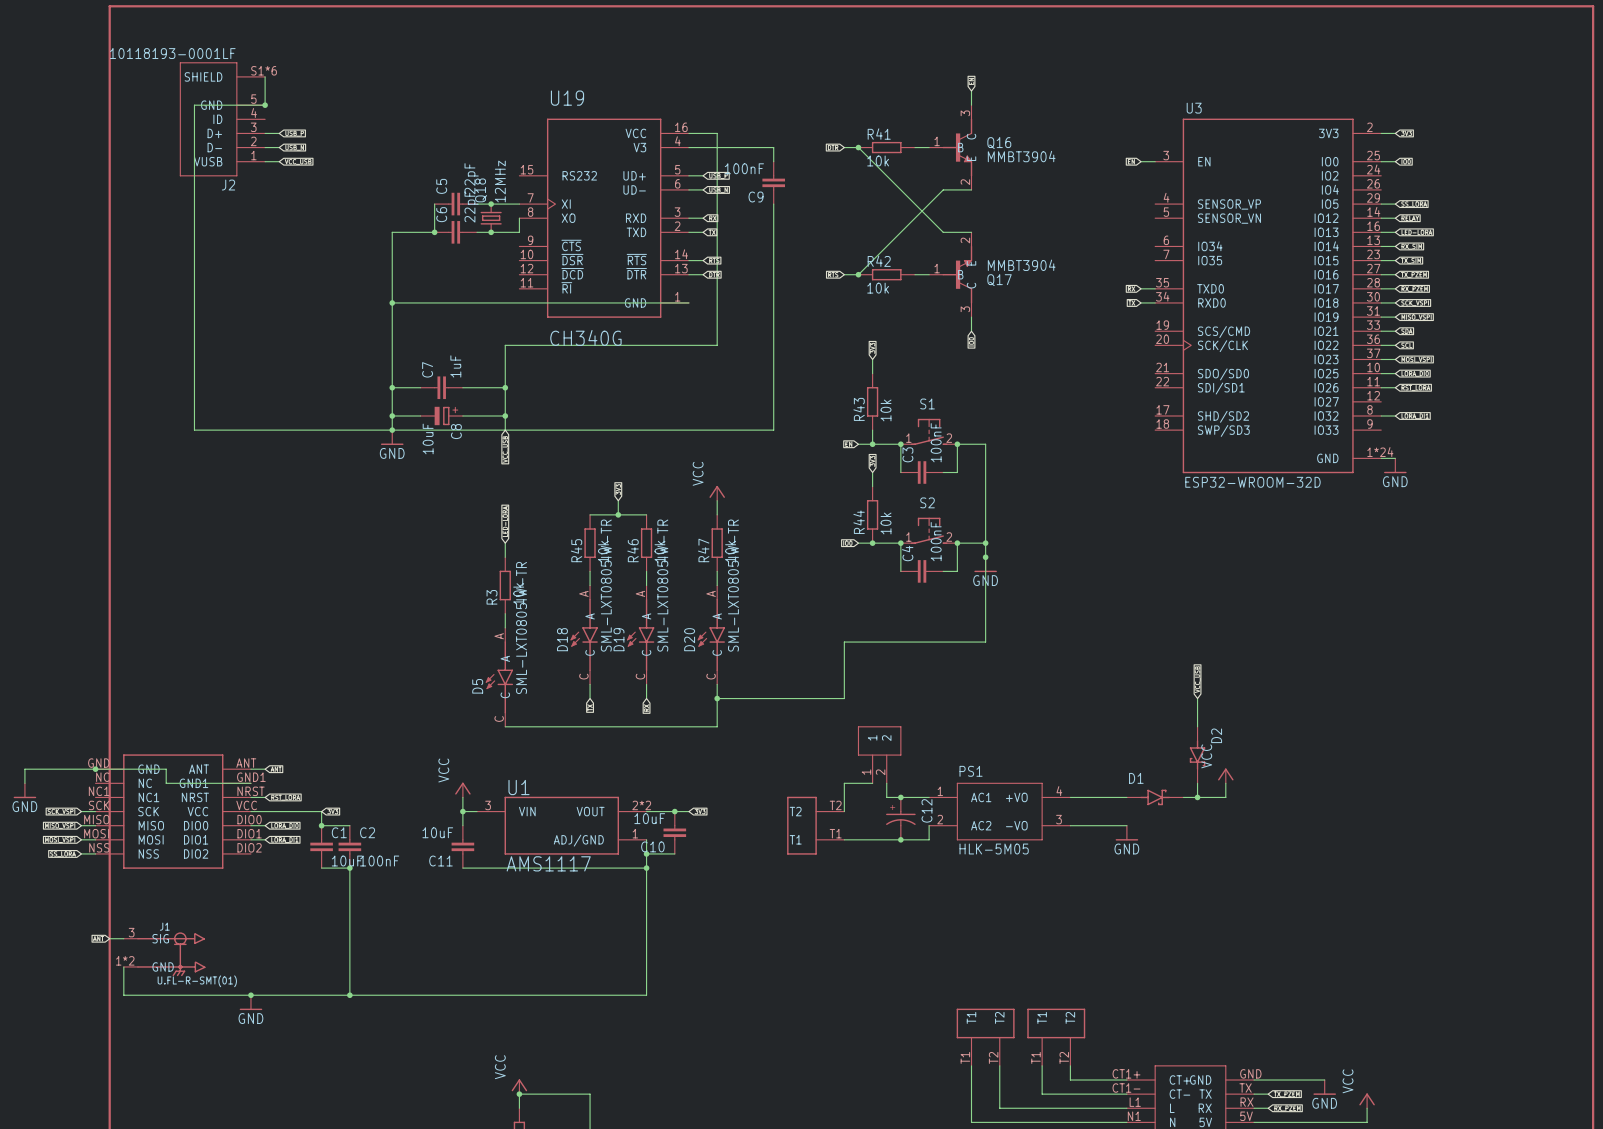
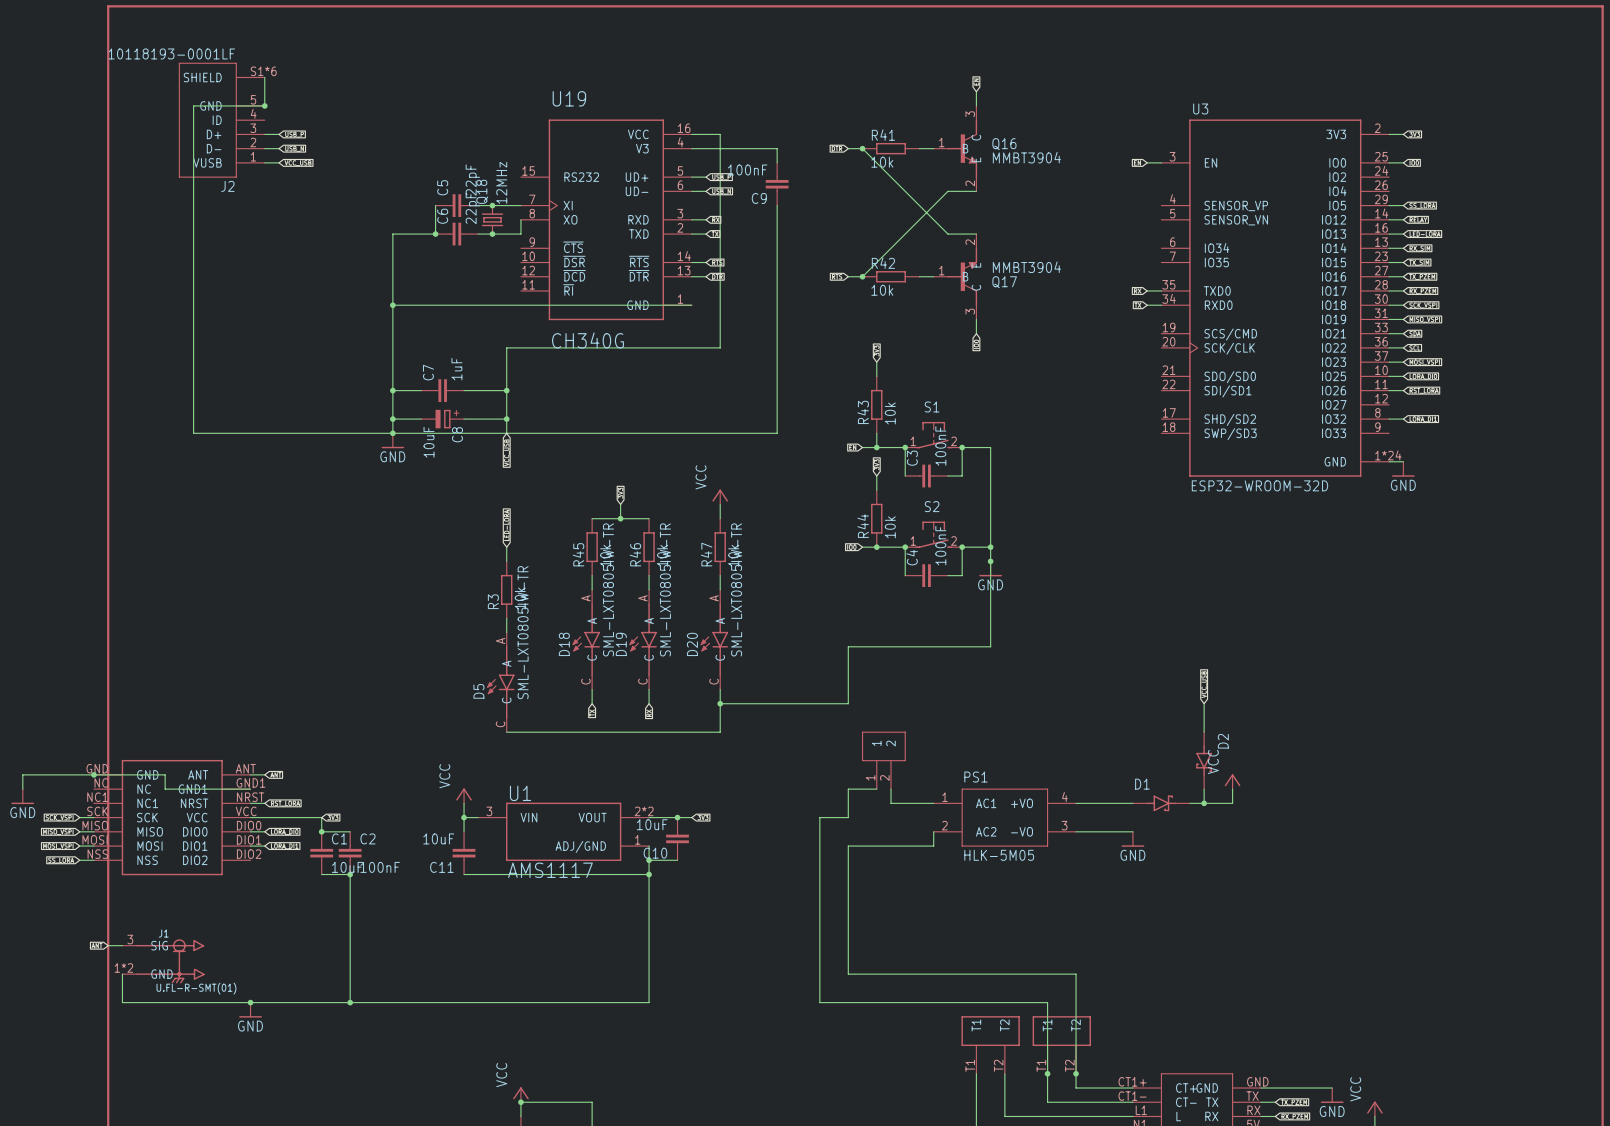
junction: (900, 797) -> none
wire: none -> (848, 817) (819, 817) (819, 1002) (1047, 1002) (1047, 1073)
C12: (900, 818) -> none
part: (815, 825) -> none
wire: none -> (848, 846) (848, 974) (1076, 974) (1076, 1073)
junction: (900, 839) -> none
junction: none -> (1047, 1073)
junction: none -> (1076, 1073)

